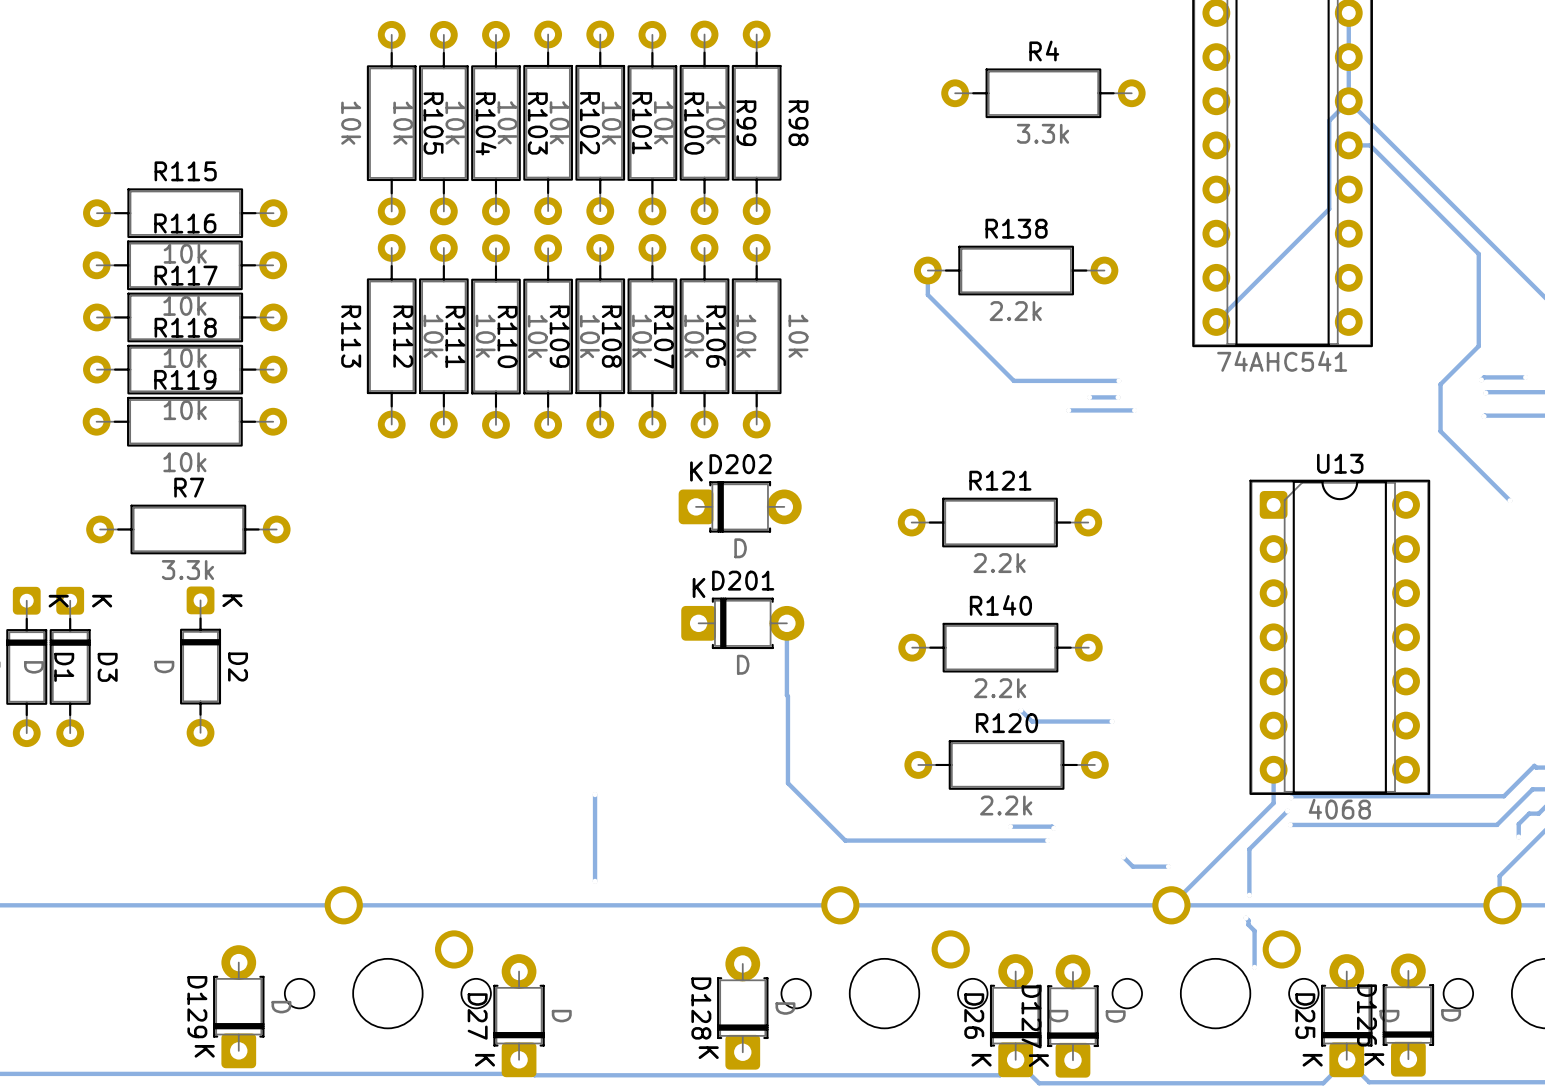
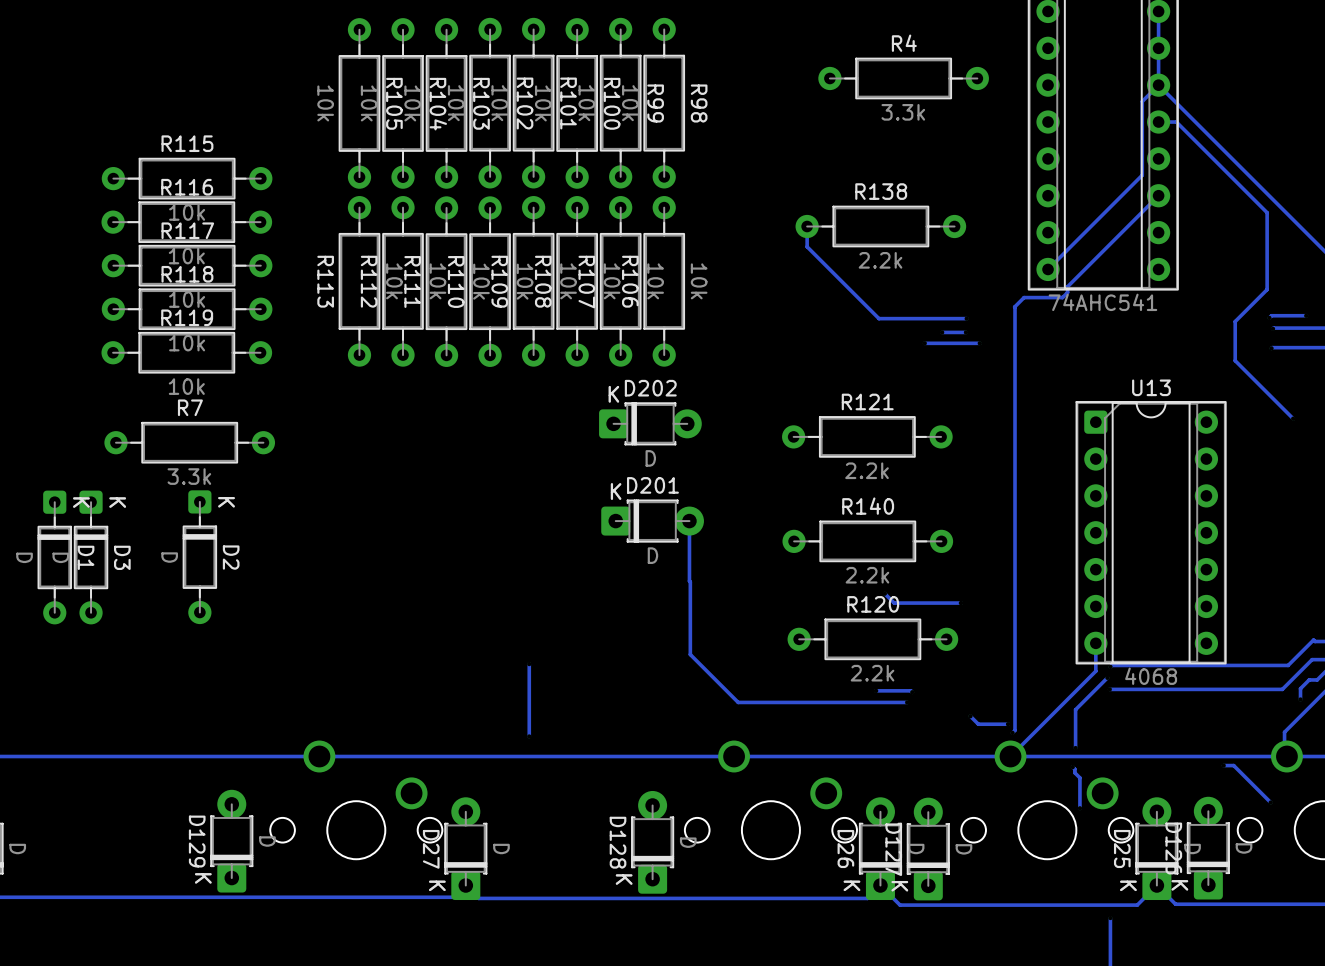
track: none -> (1158, 195) (1067, 286) (1067, 292) (1062, 297) (1024, 297) (1014, 307) (1015, 730) (1012, 732)
via: none -> (1012, 732)
track: none -> (1223, 765) (1233, 765) (1270, 802)
via: none -> (1223, 765)
via: none -> (1270, 802)

